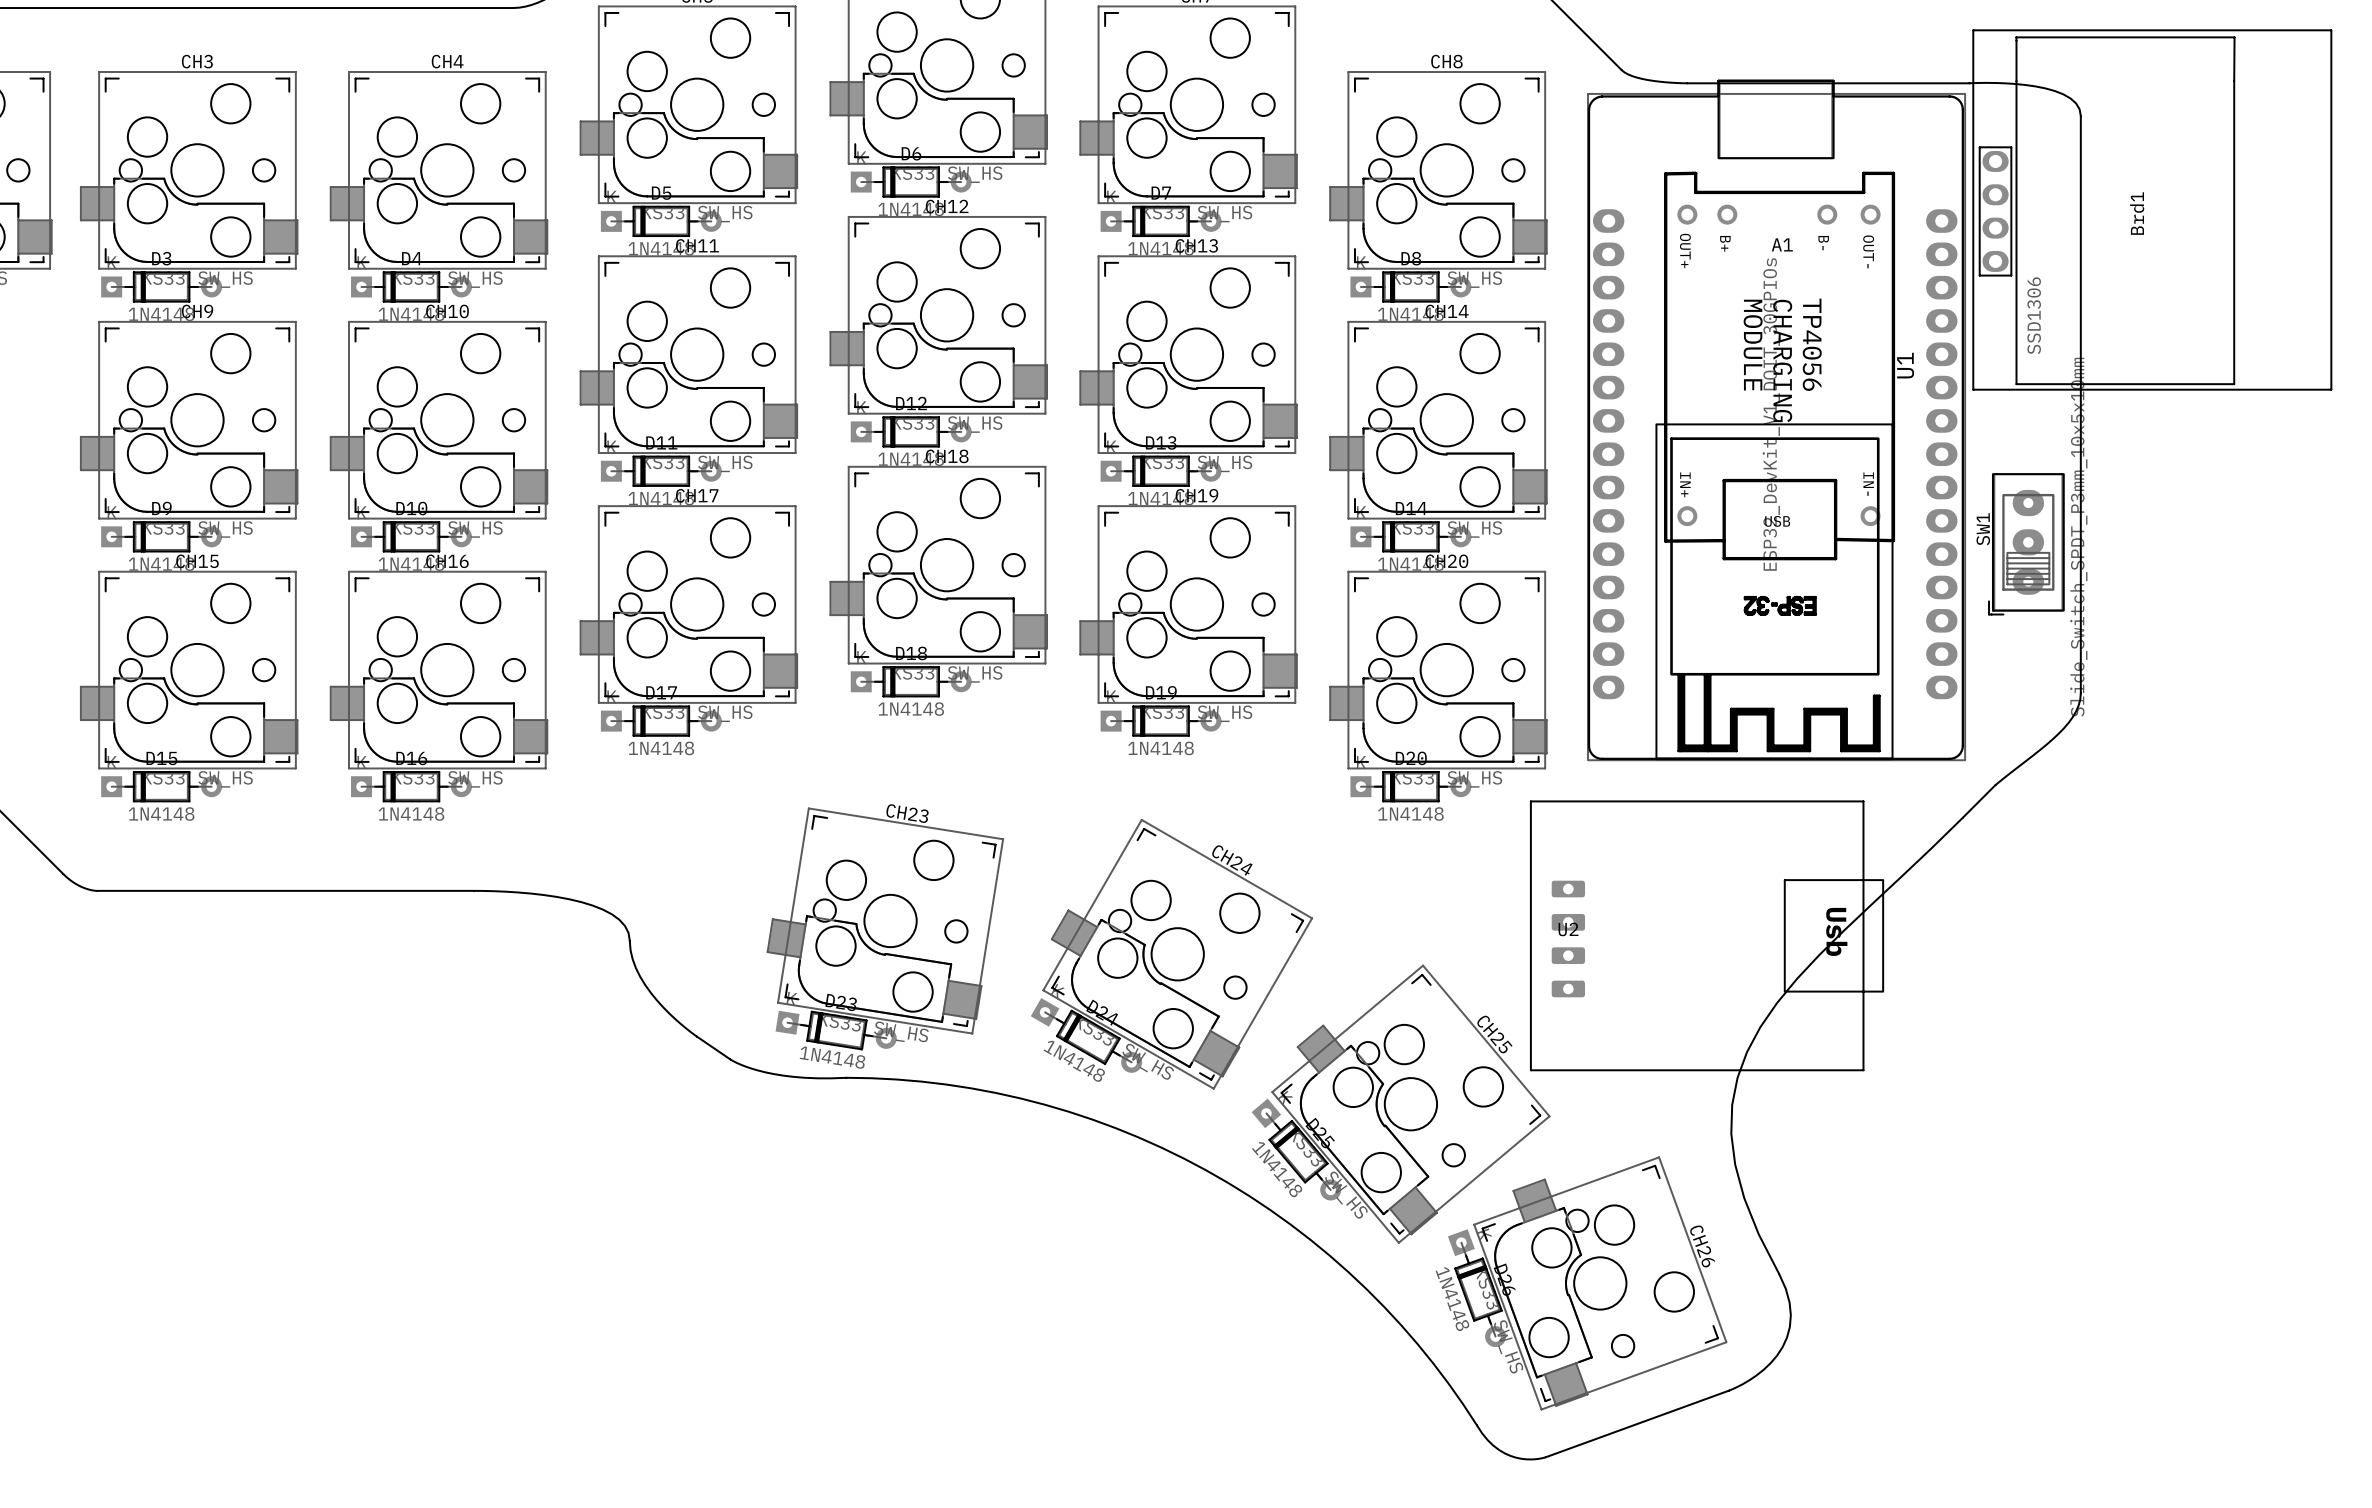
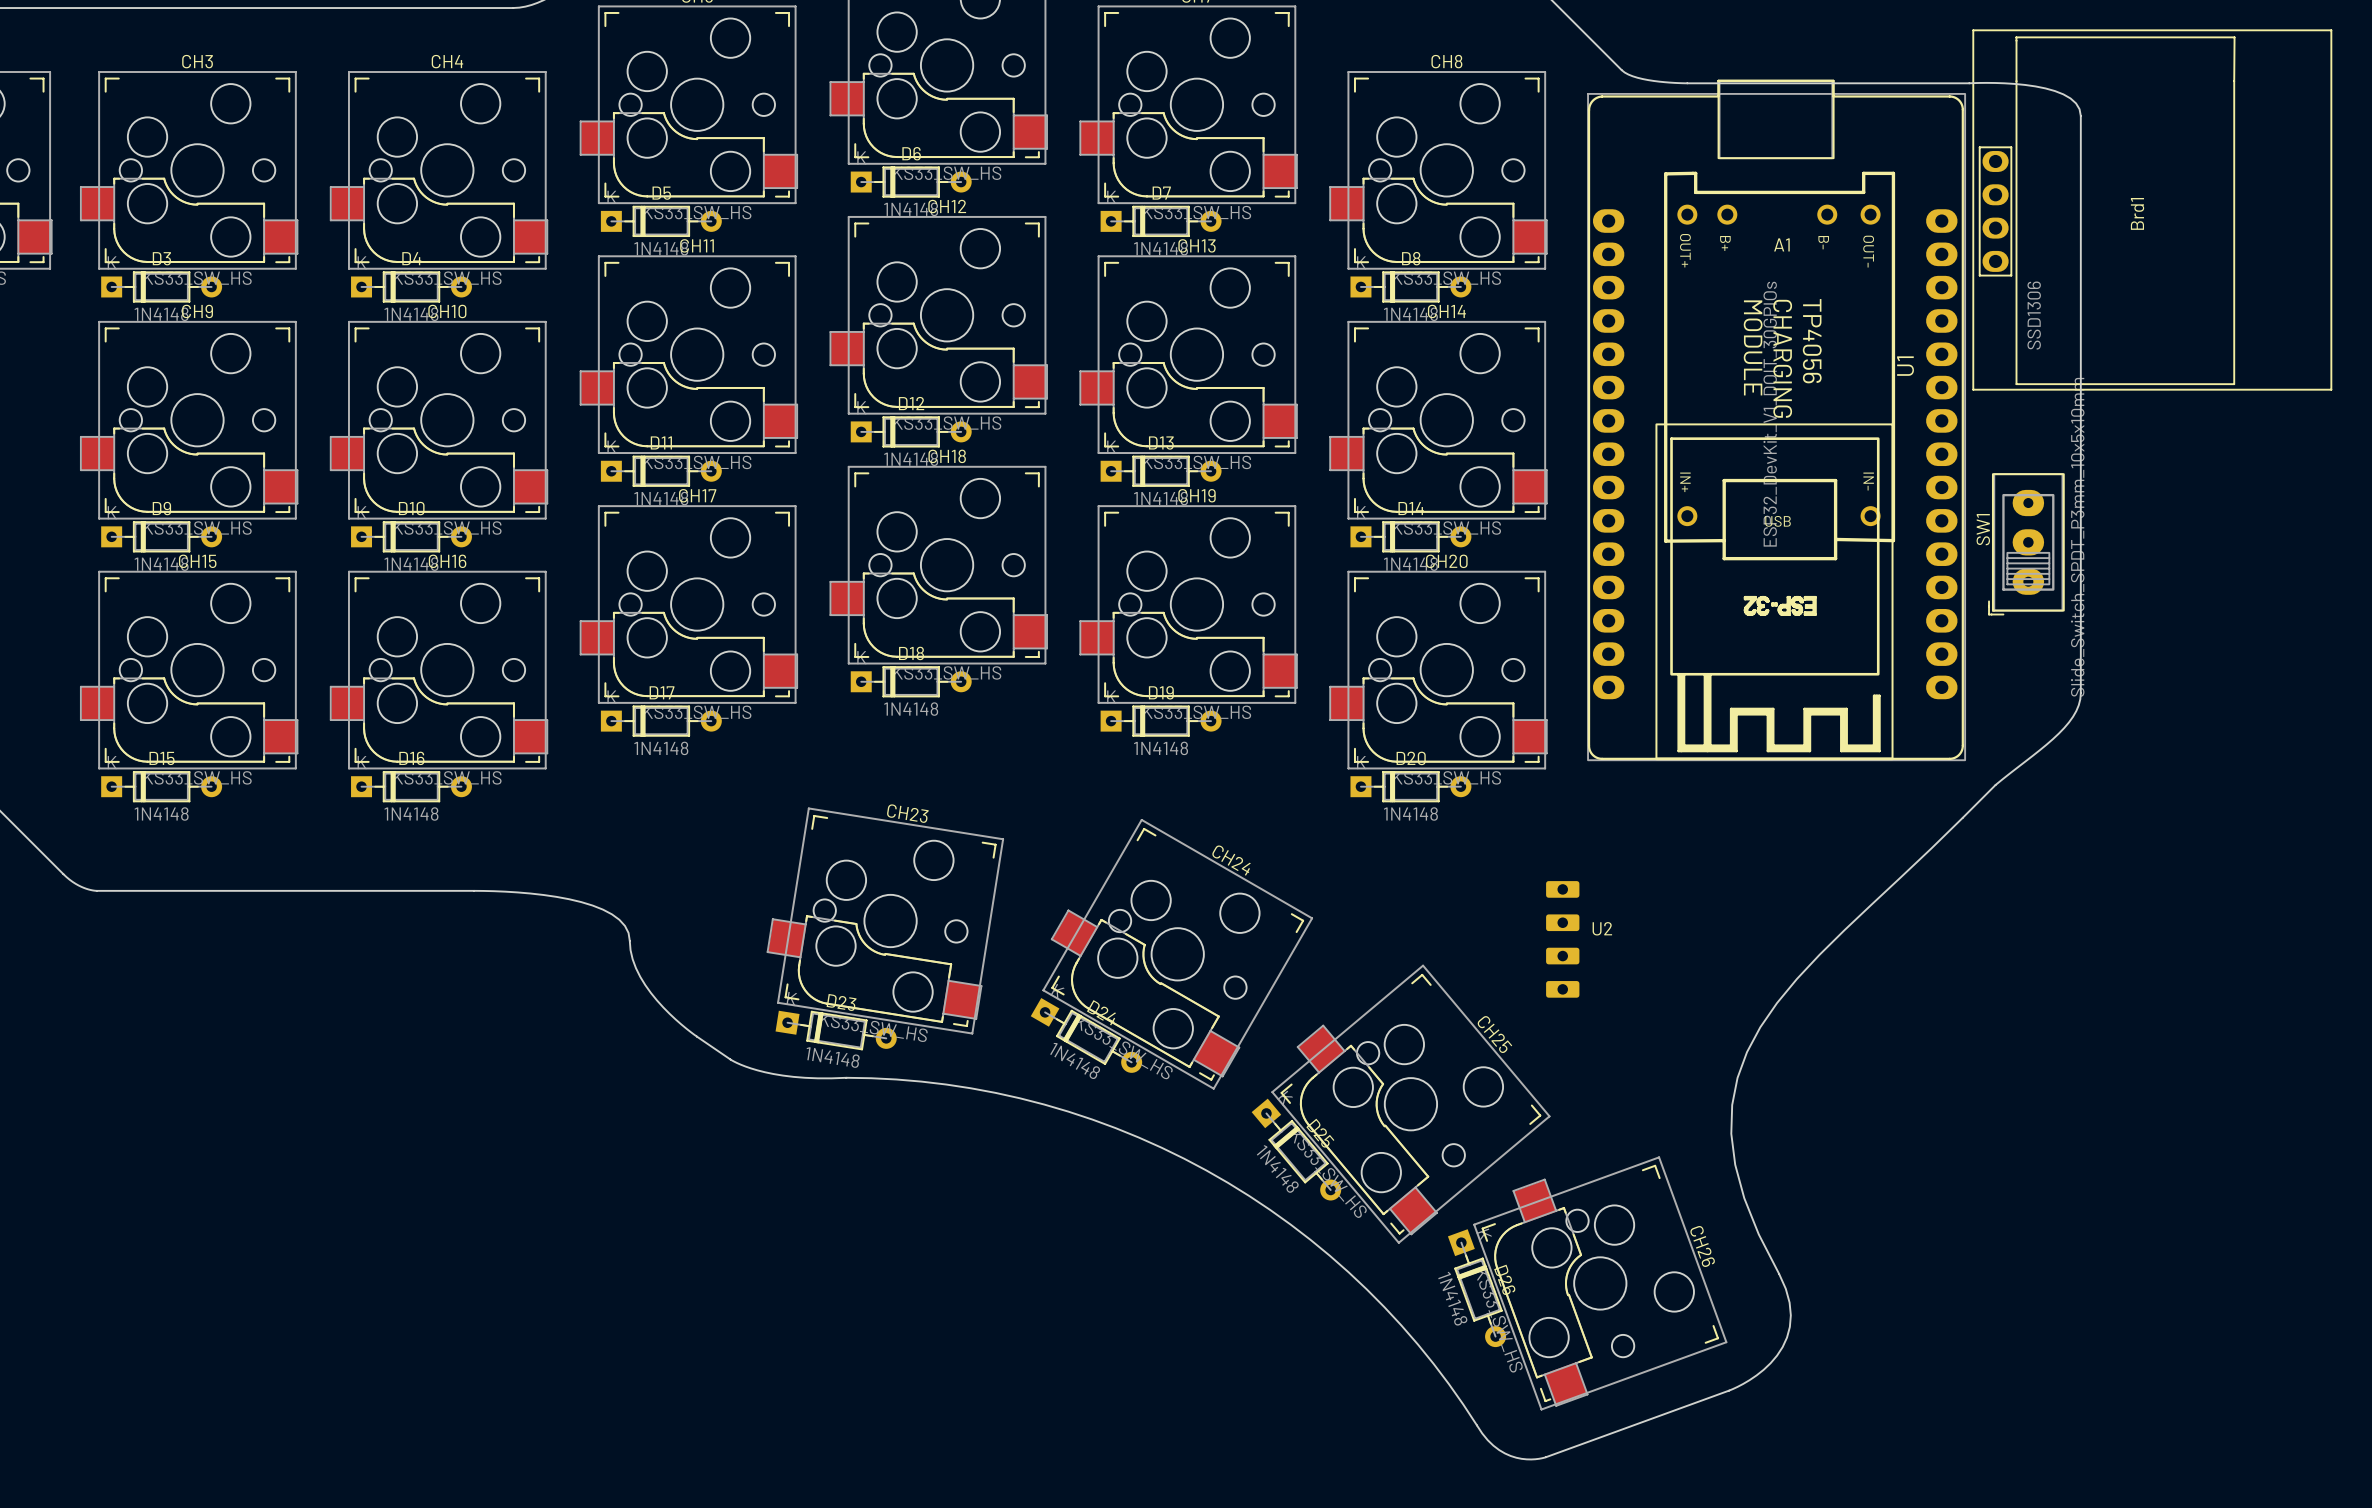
U2 footprint: [1530, 800, 1884, 1071] -> [1546, 881, 1580, 998]
U2 name position: U2 (1568, 929) -> U2 (1602, 928)

